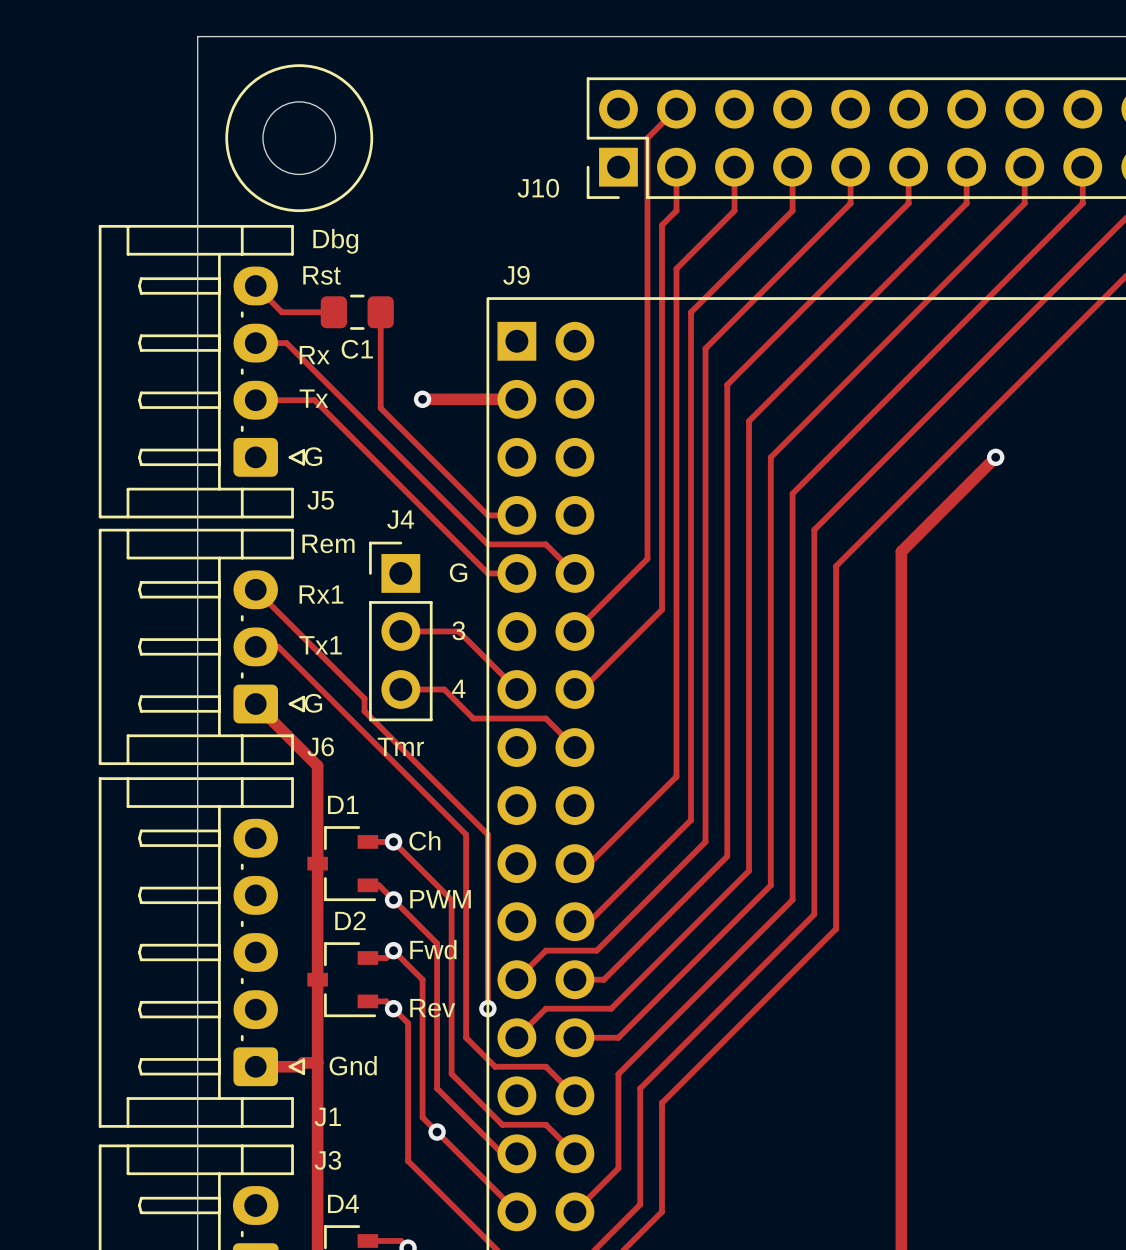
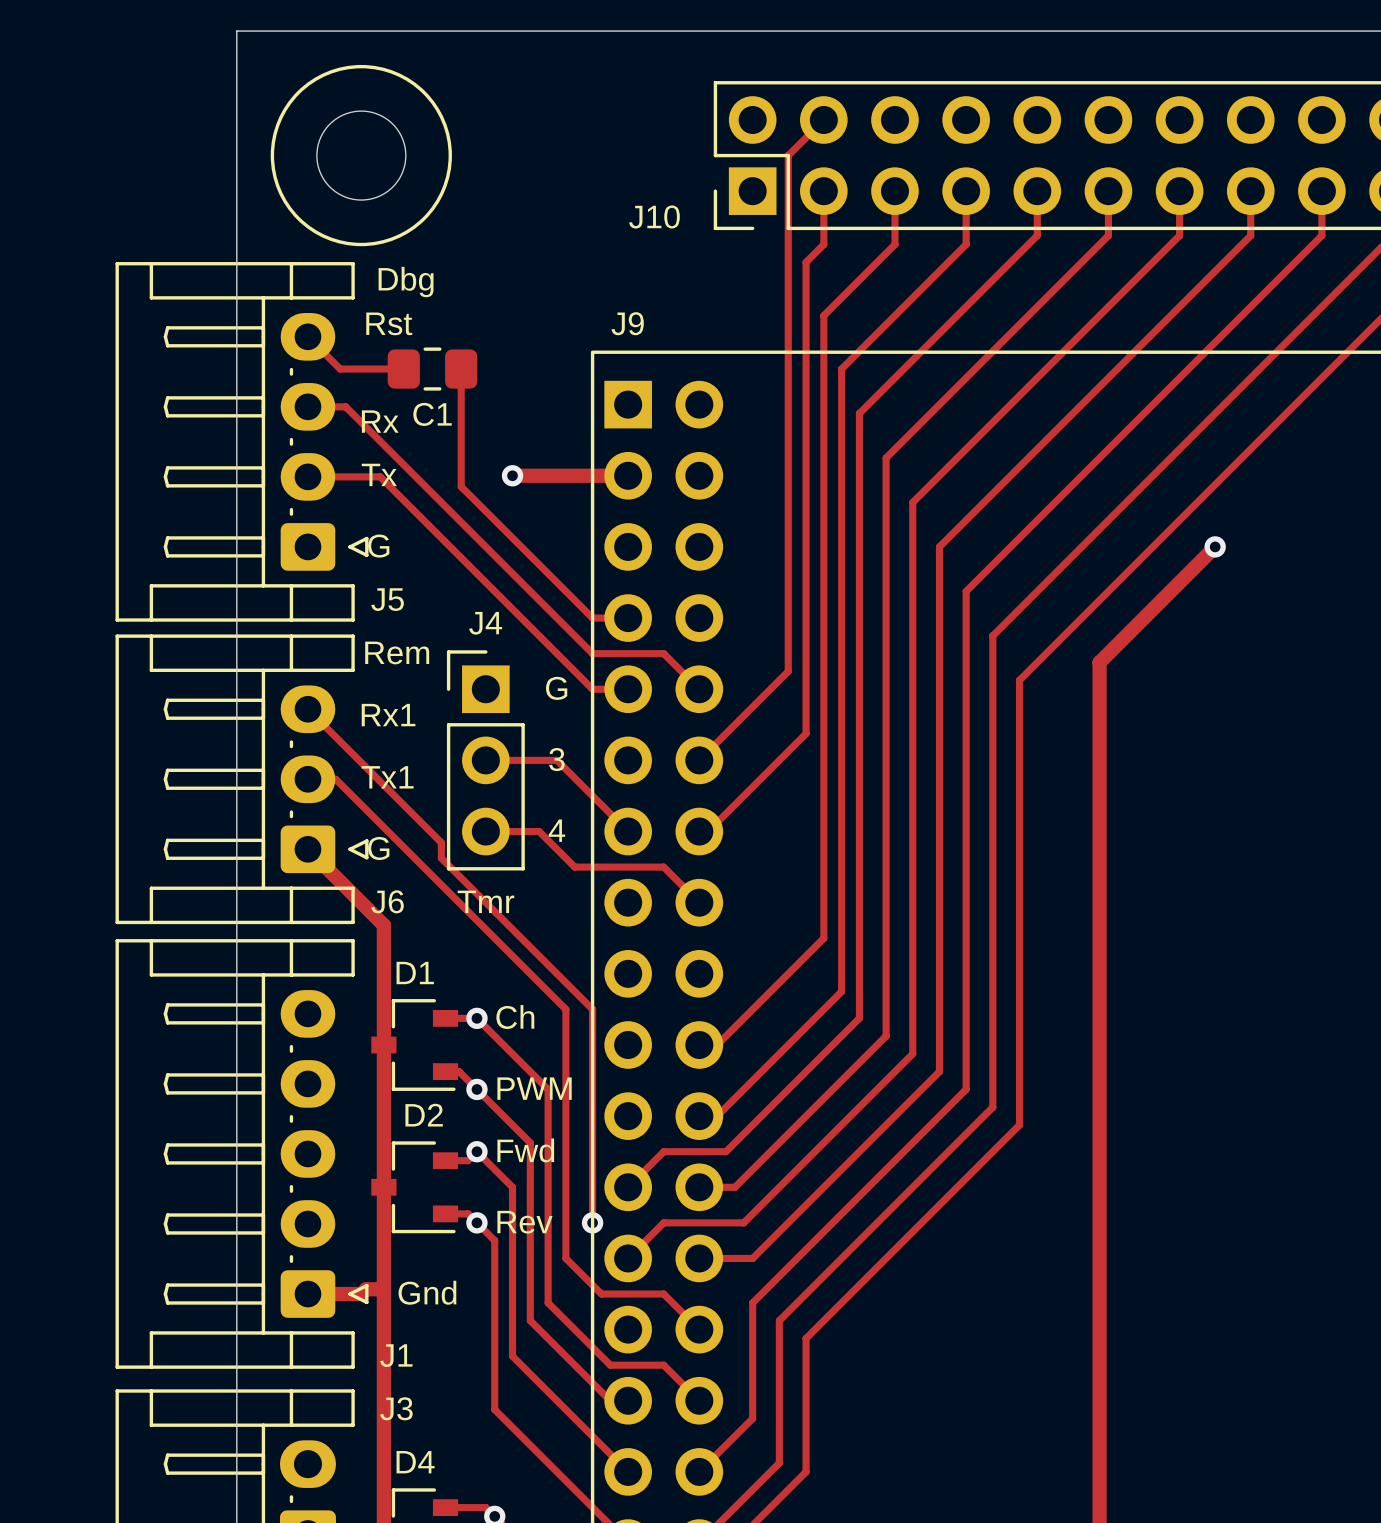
via: (437, 1132) -> none

